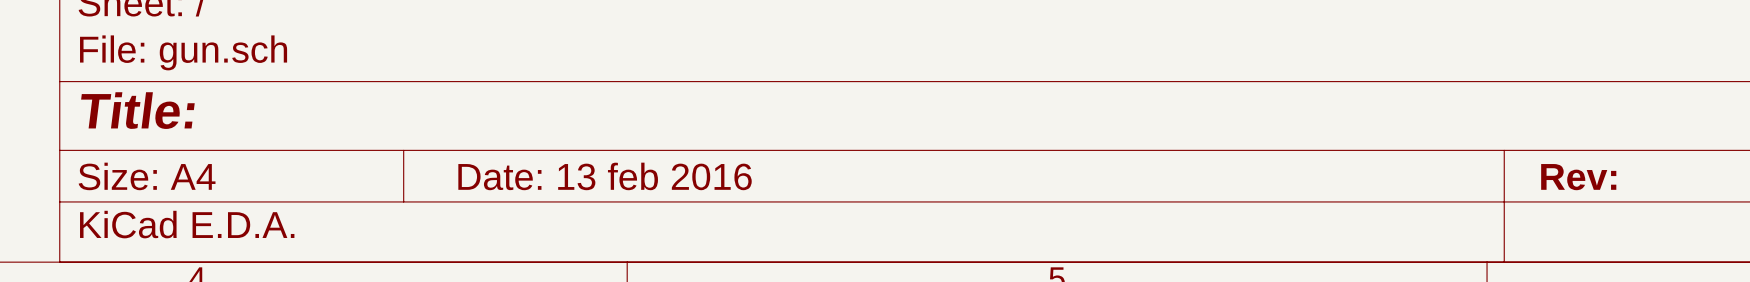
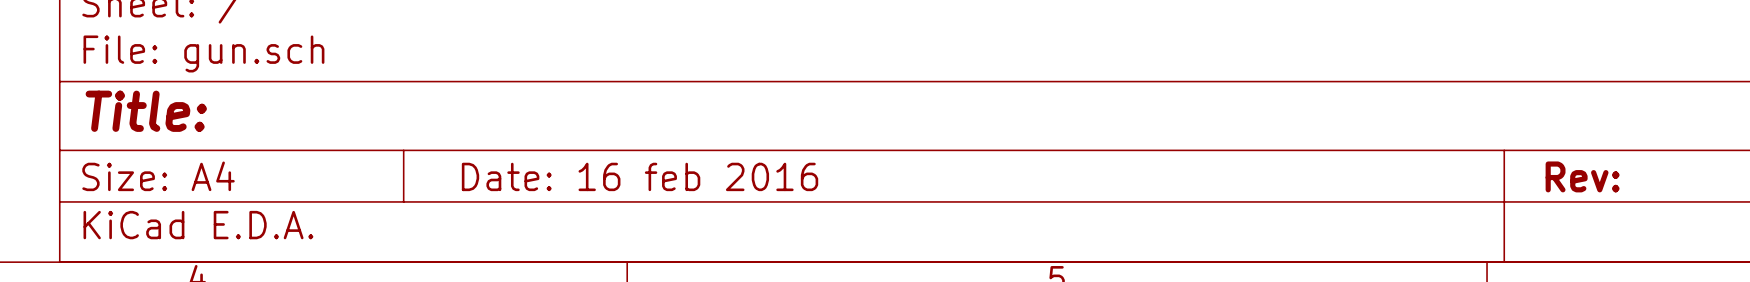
title block: Date: 13 feb 2016 (605, 176) -> Date: 16 feb 2016 (640, 176)

